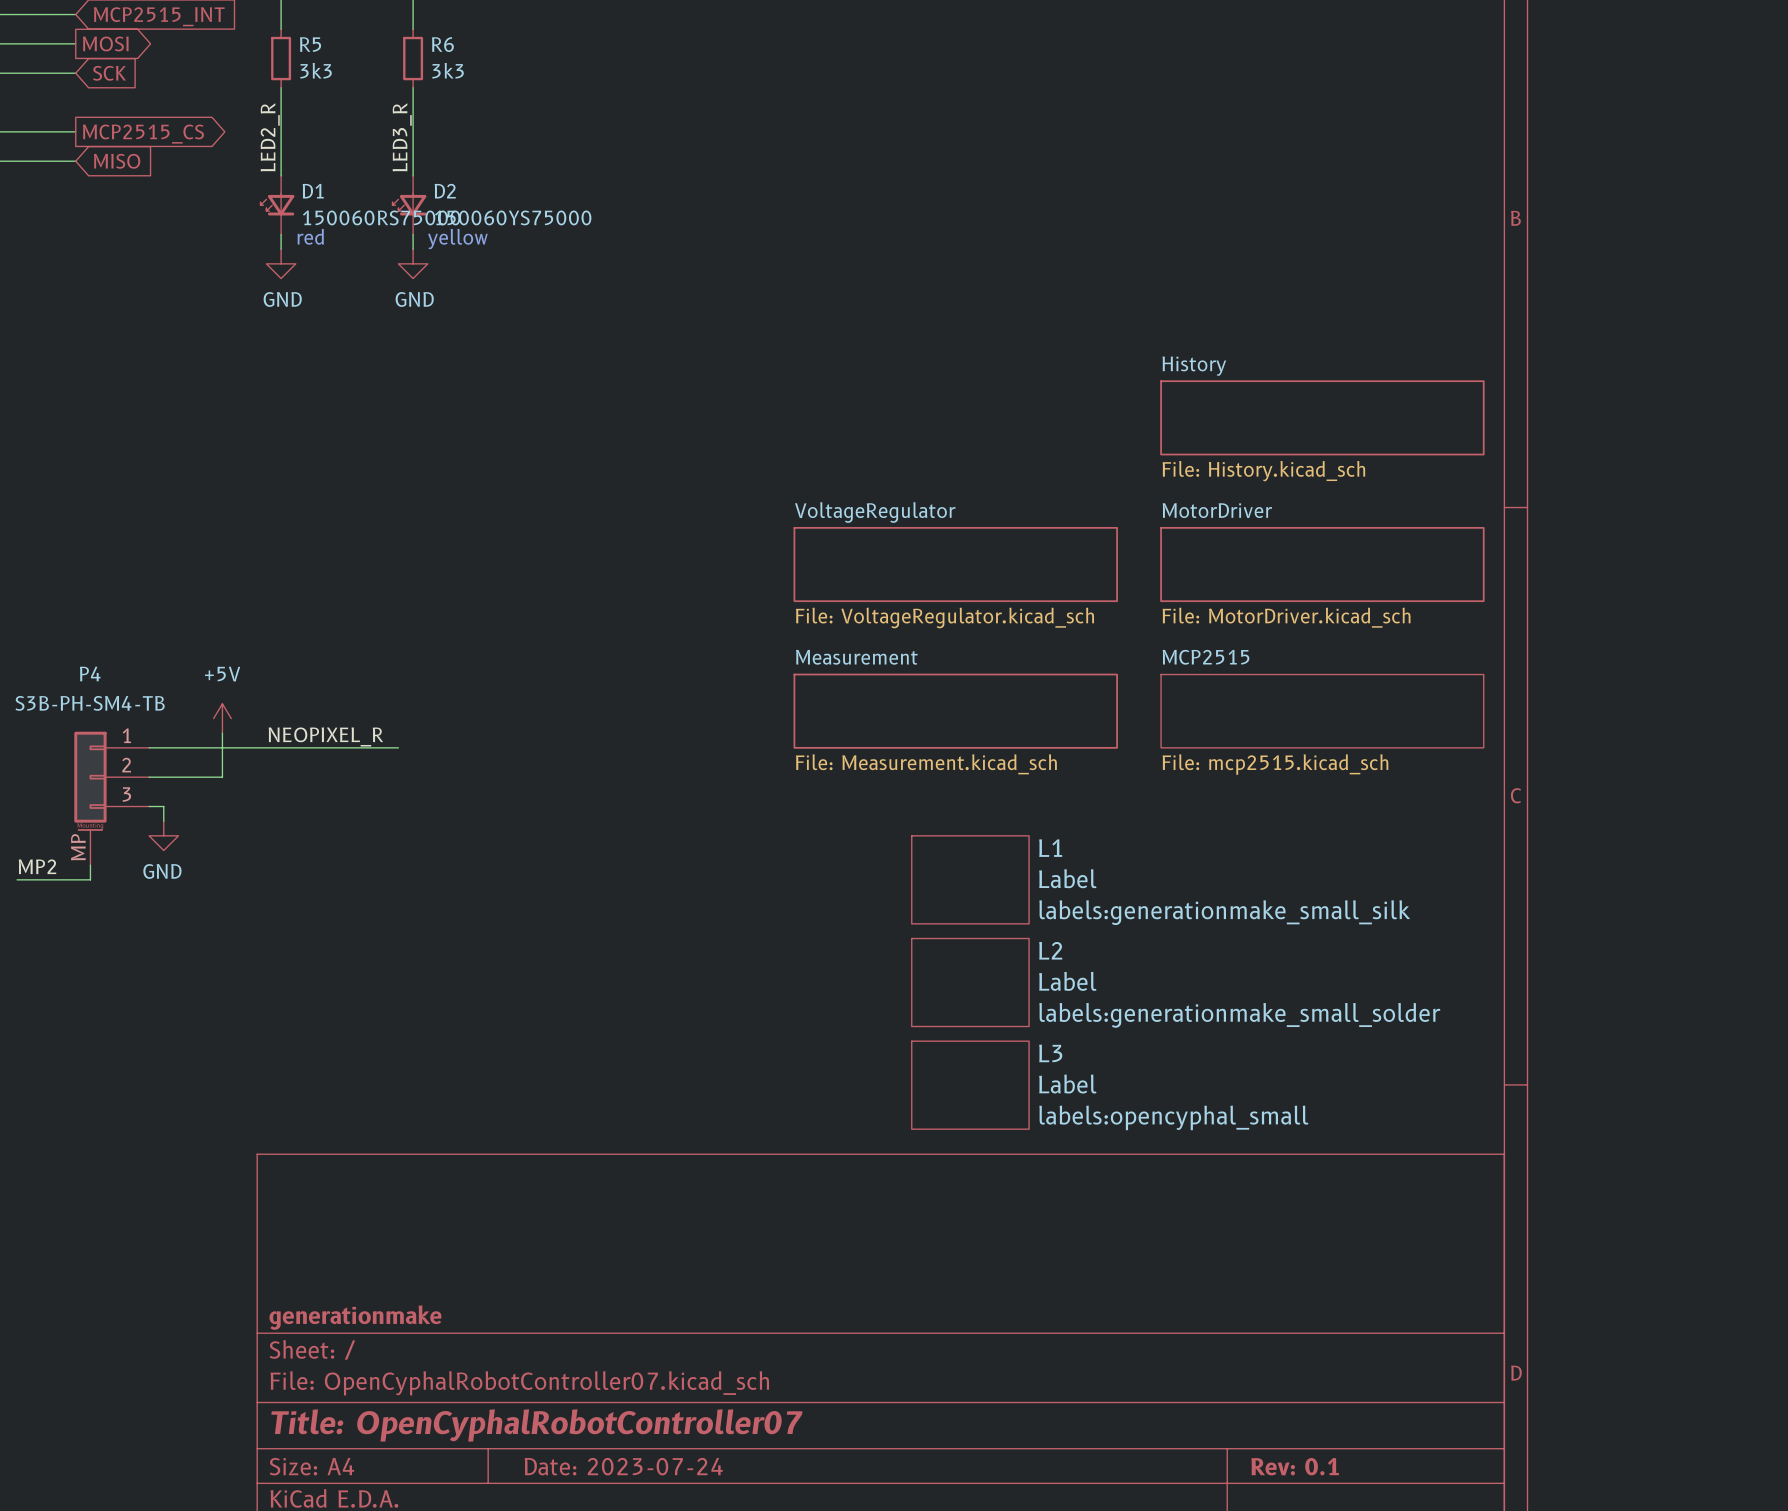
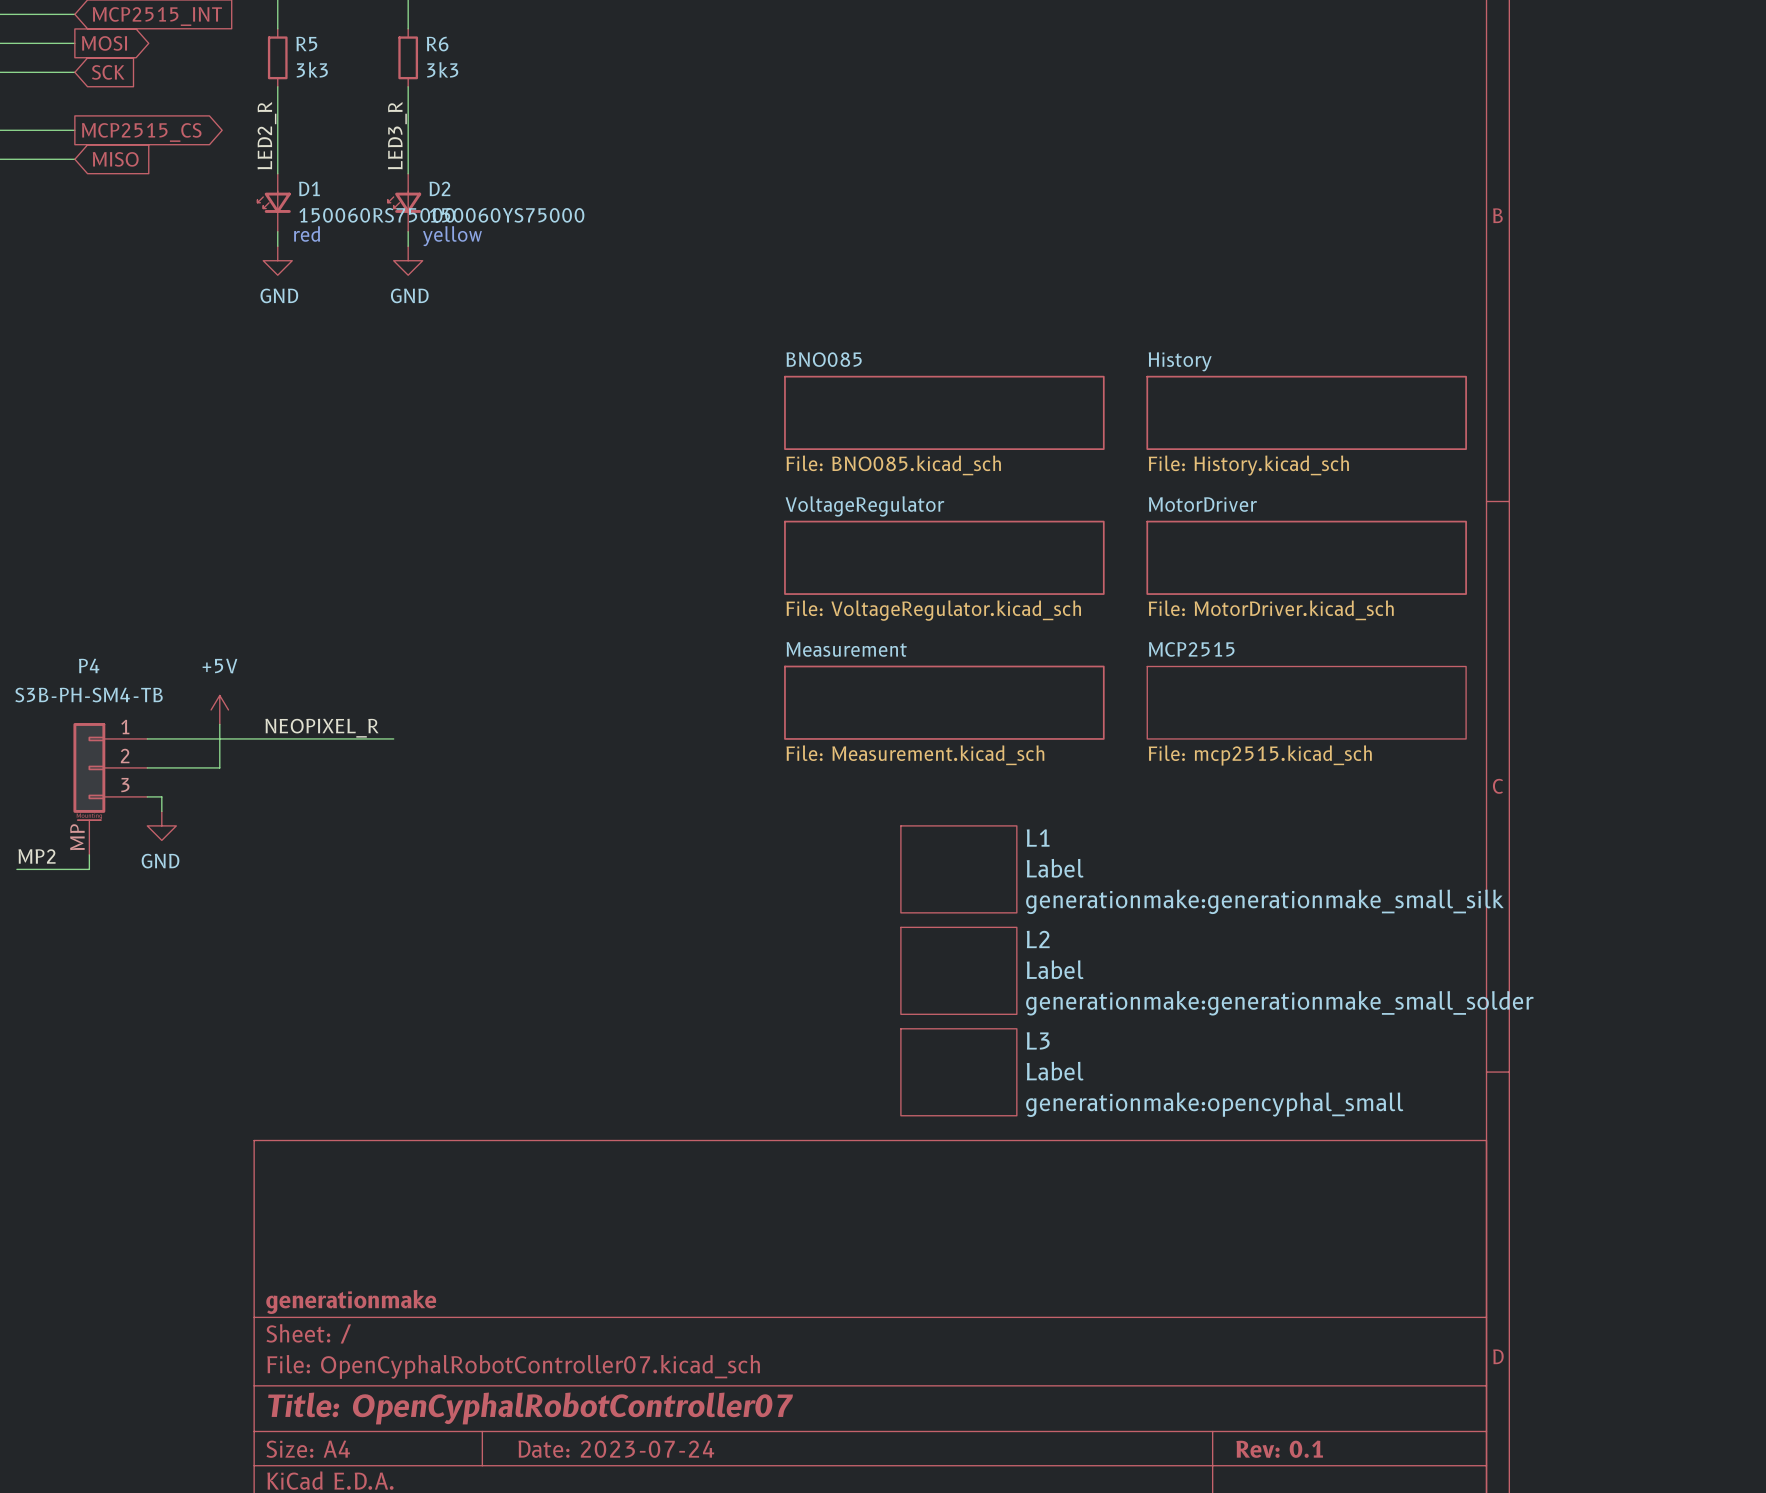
sheet BNO085: none -> File: BNO085.kicad_sch (944, 412)
L1 text: labels:generationmake_small_silk (1224, 912) -> generationmake:generationmake_small_silk (1264, 901)
L2 text: labels:generationmake_small_solder (1239, 1015) -> generationmake:generationmake_small_solder (1279, 1003)
L3 text: labels:opencyphal_small (1173, 1117) -> generationmake:opencyphal_small (1214, 1104)

